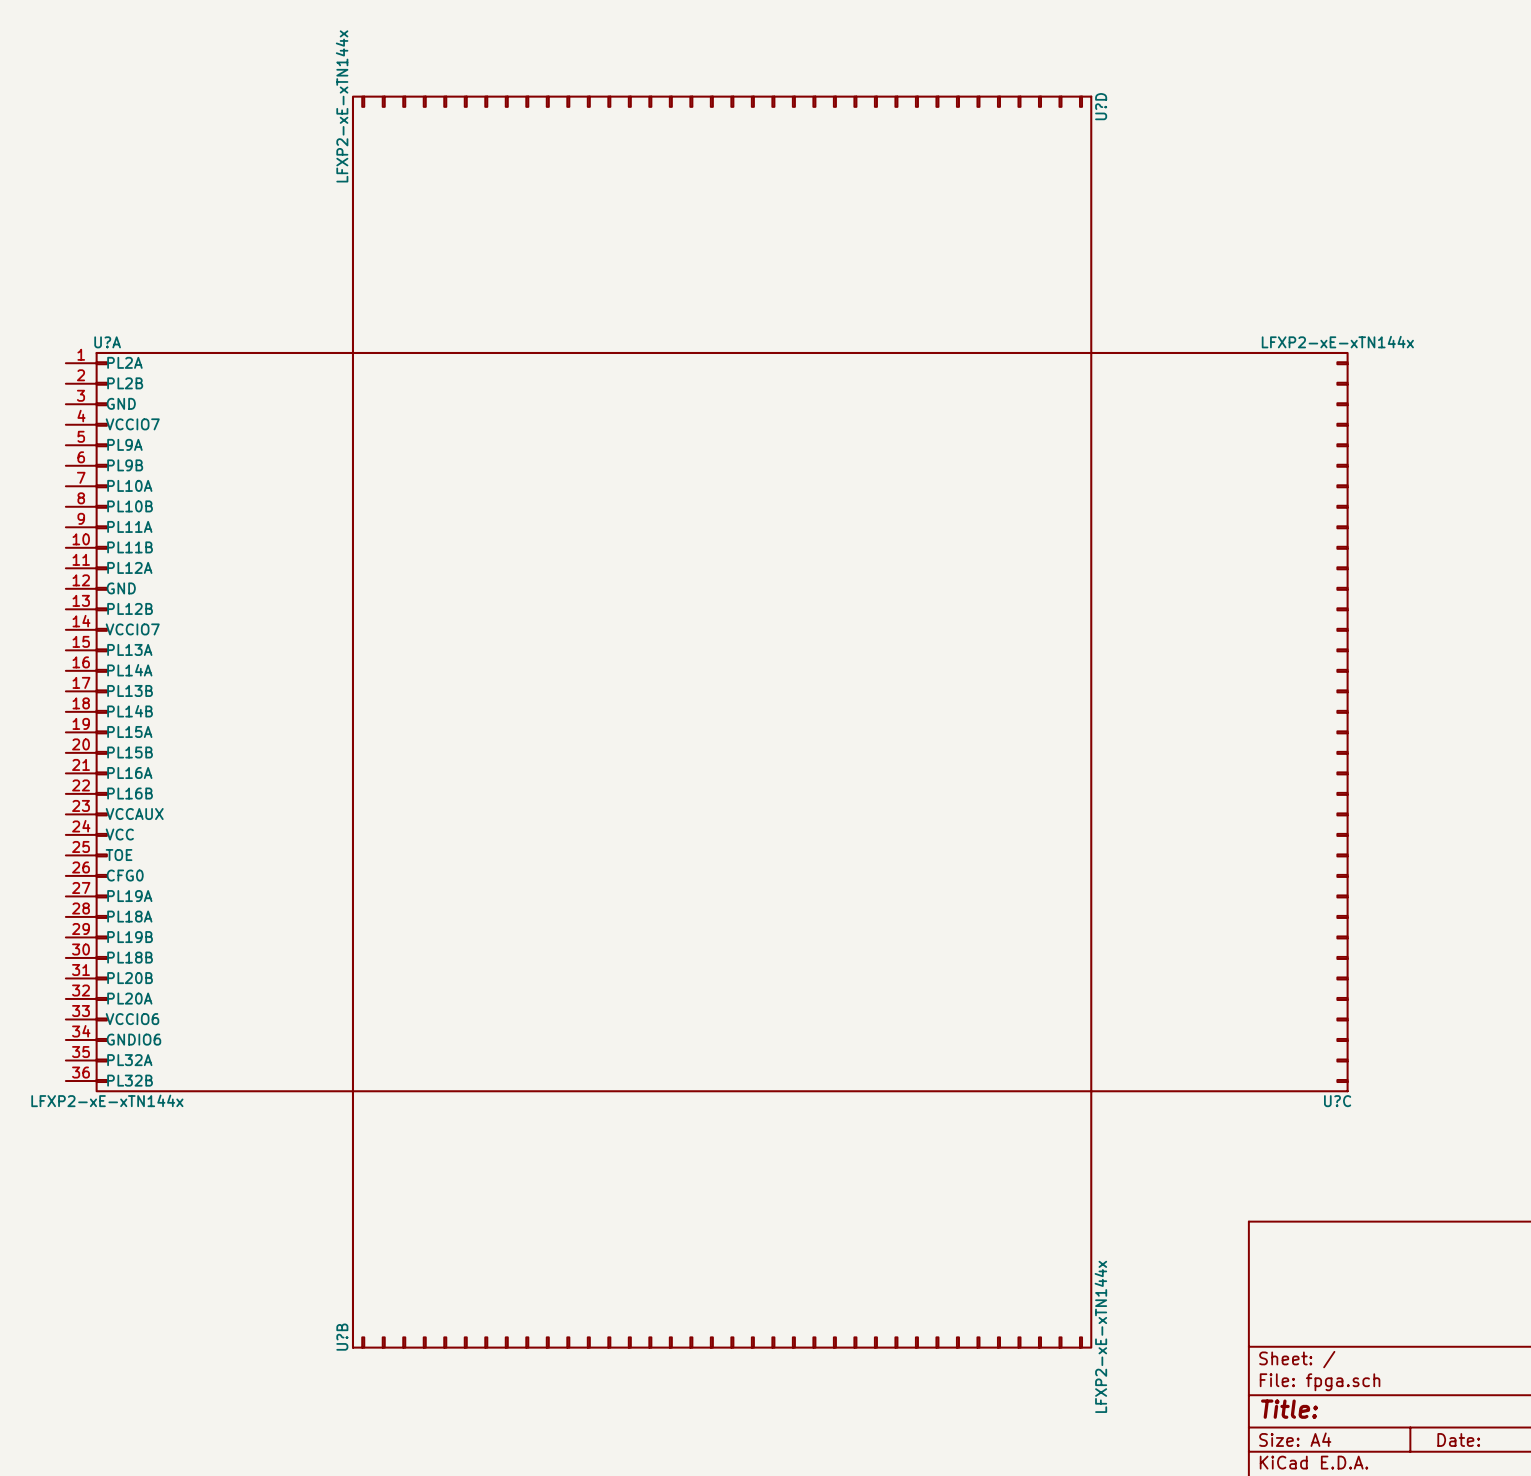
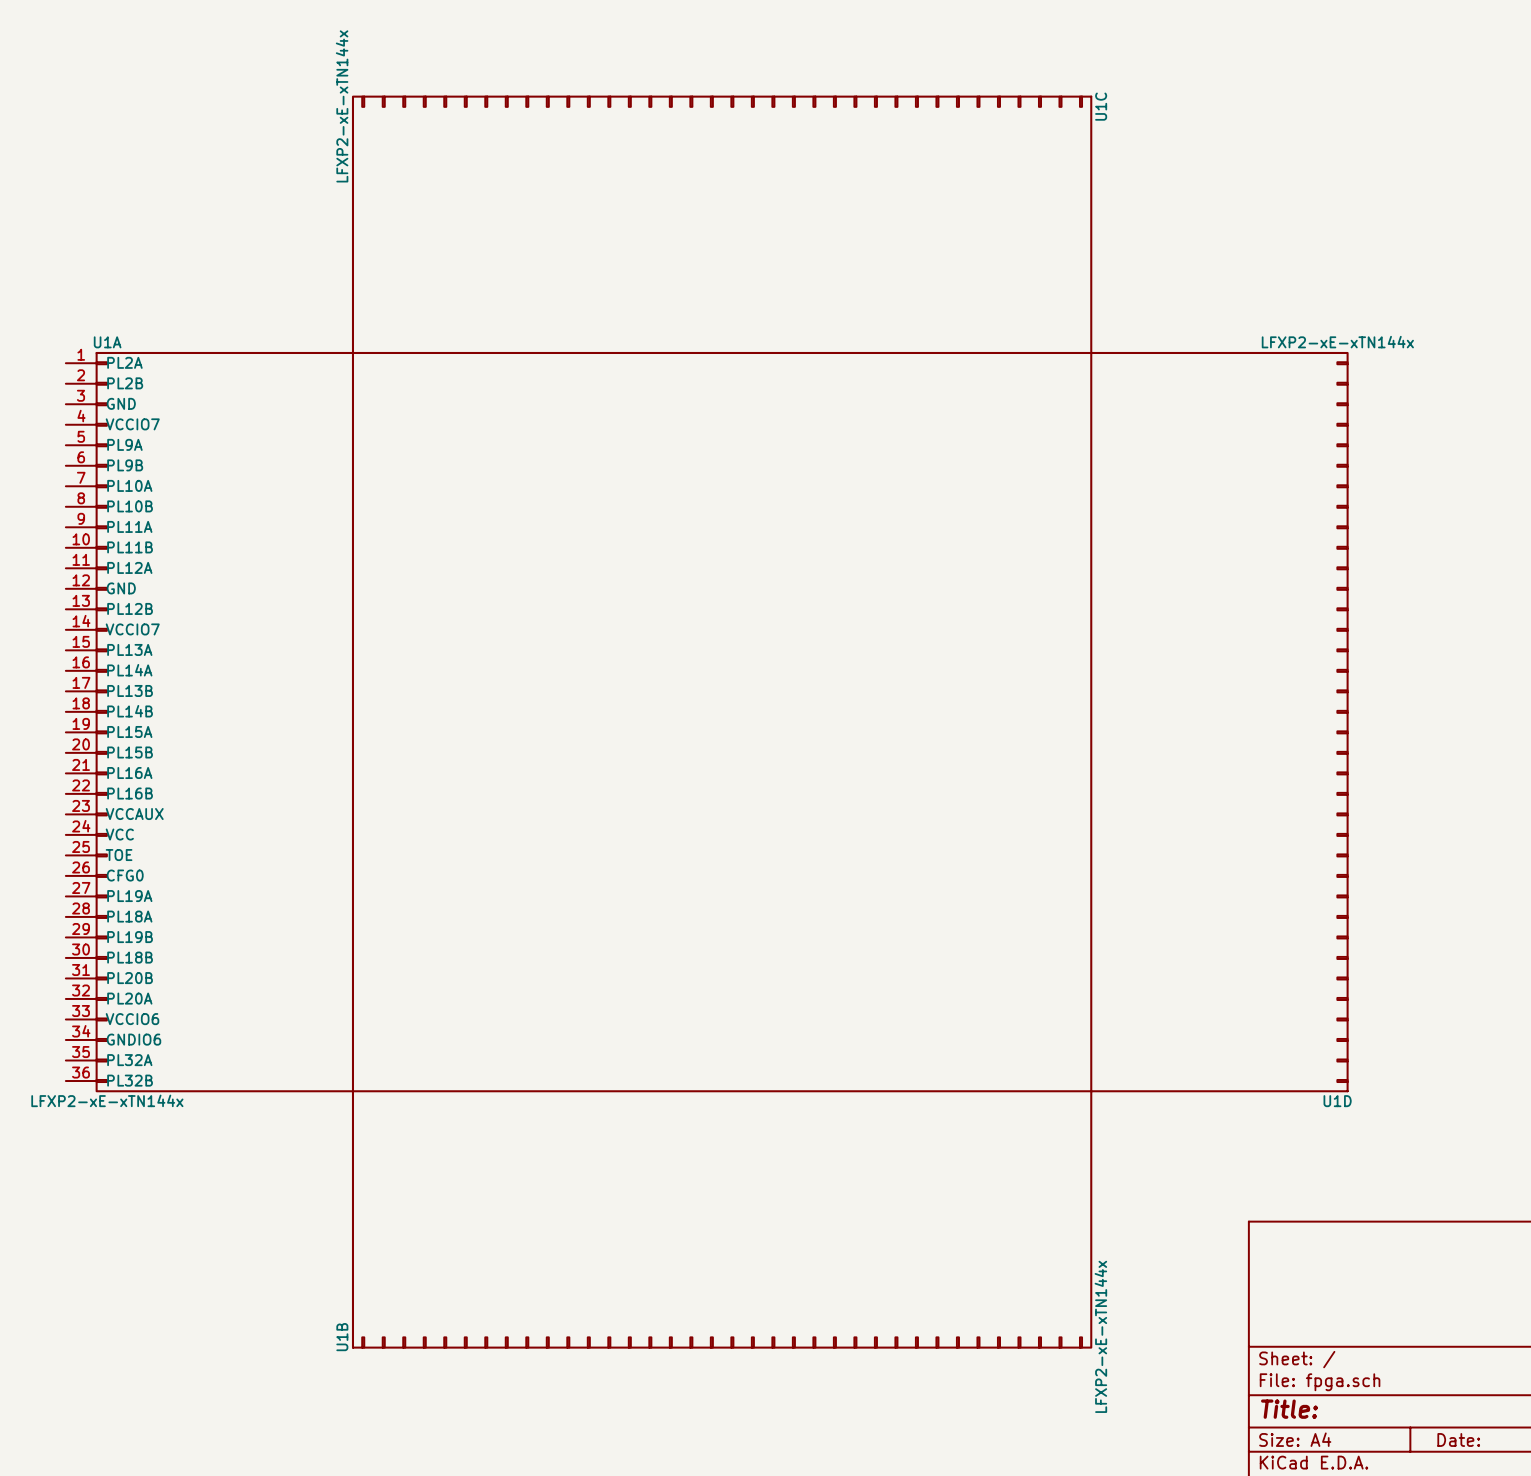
U?D name: U?D (1101, 106) -> U1C (1101, 106)
U?A name: U?A (107, 342) -> U1A (107, 342)
U?C name: U?C (1337, 1101) -> U1D (1337, 1101)
U?B name: U?B (342, 1337) -> U1B (342, 1337)

